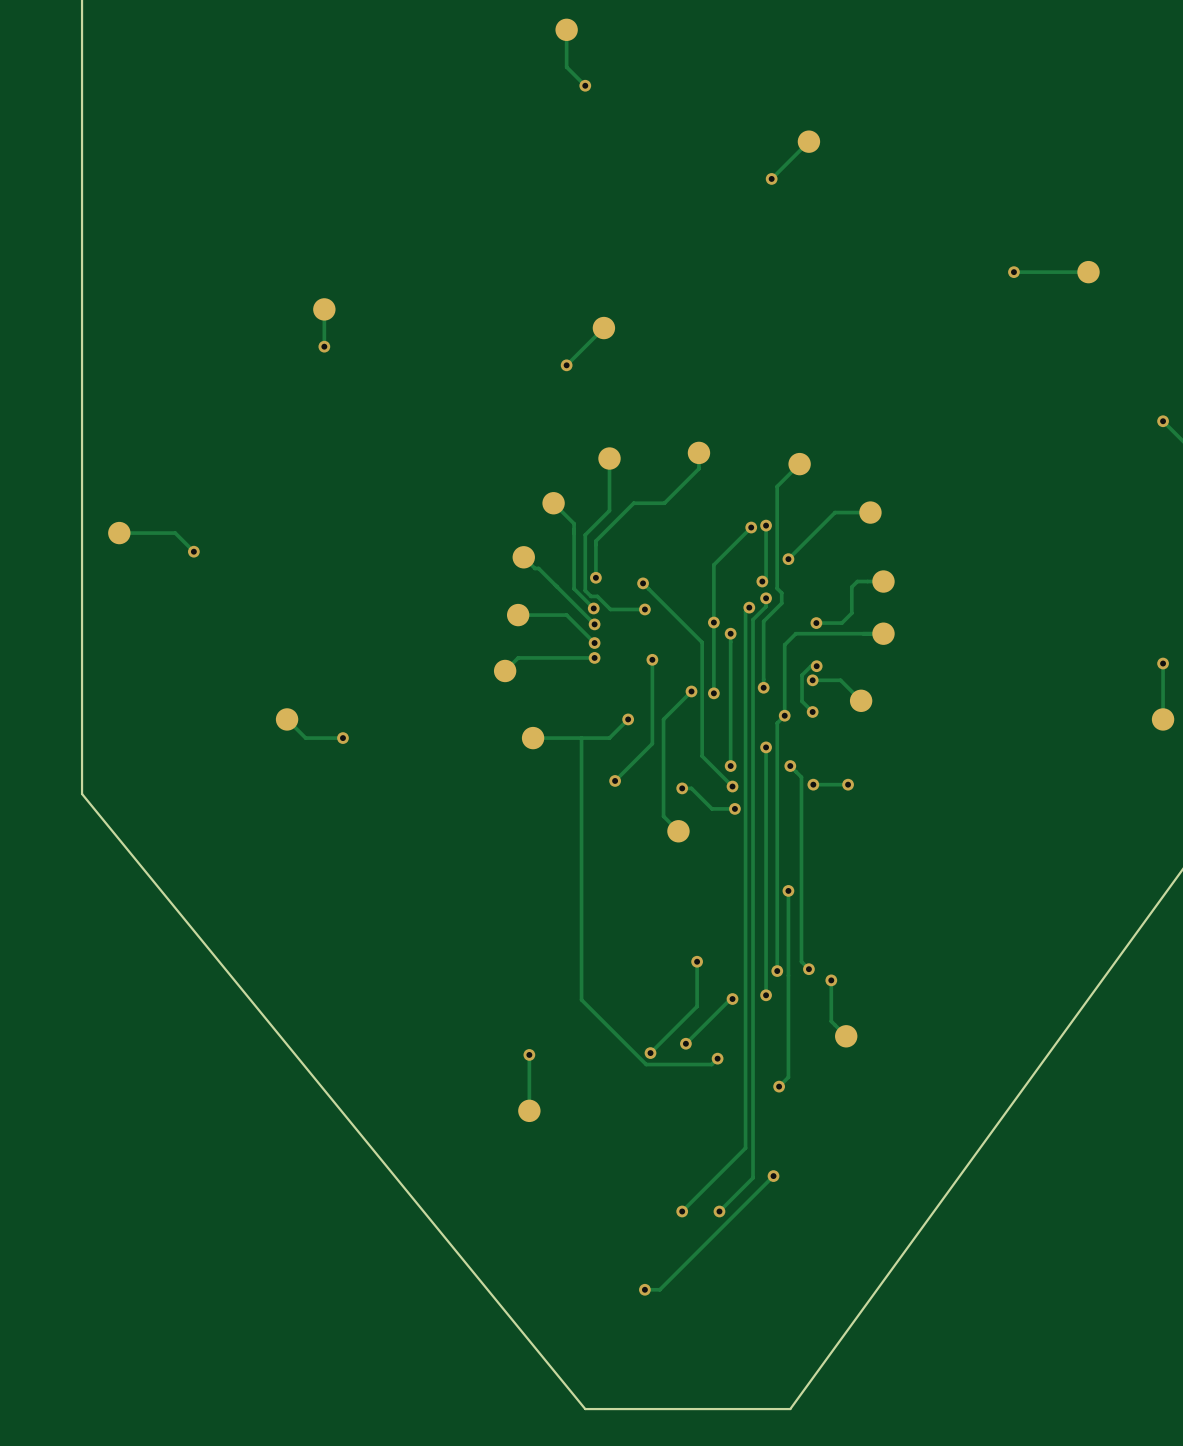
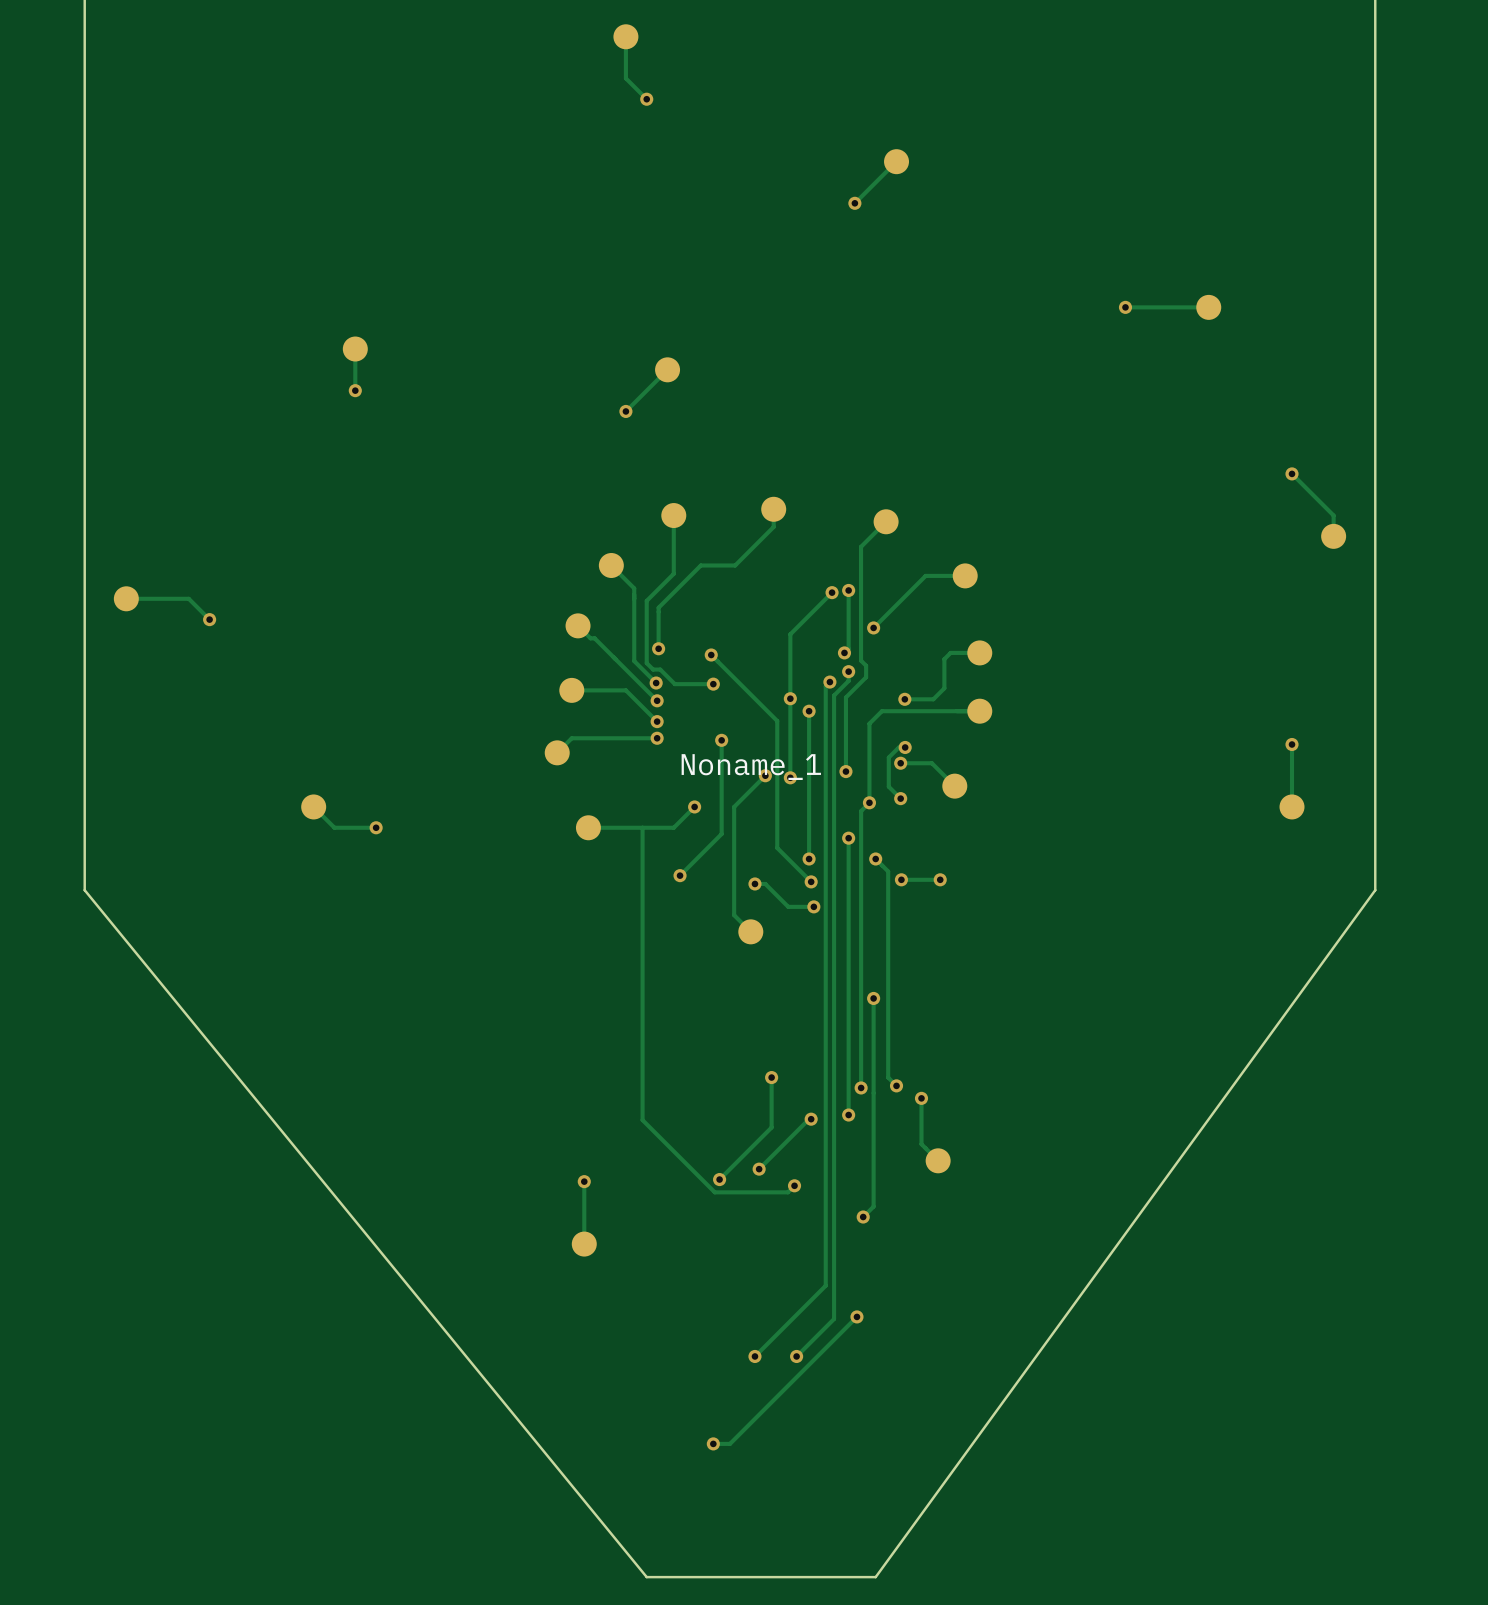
Noname_1: none -> (751, 767)

